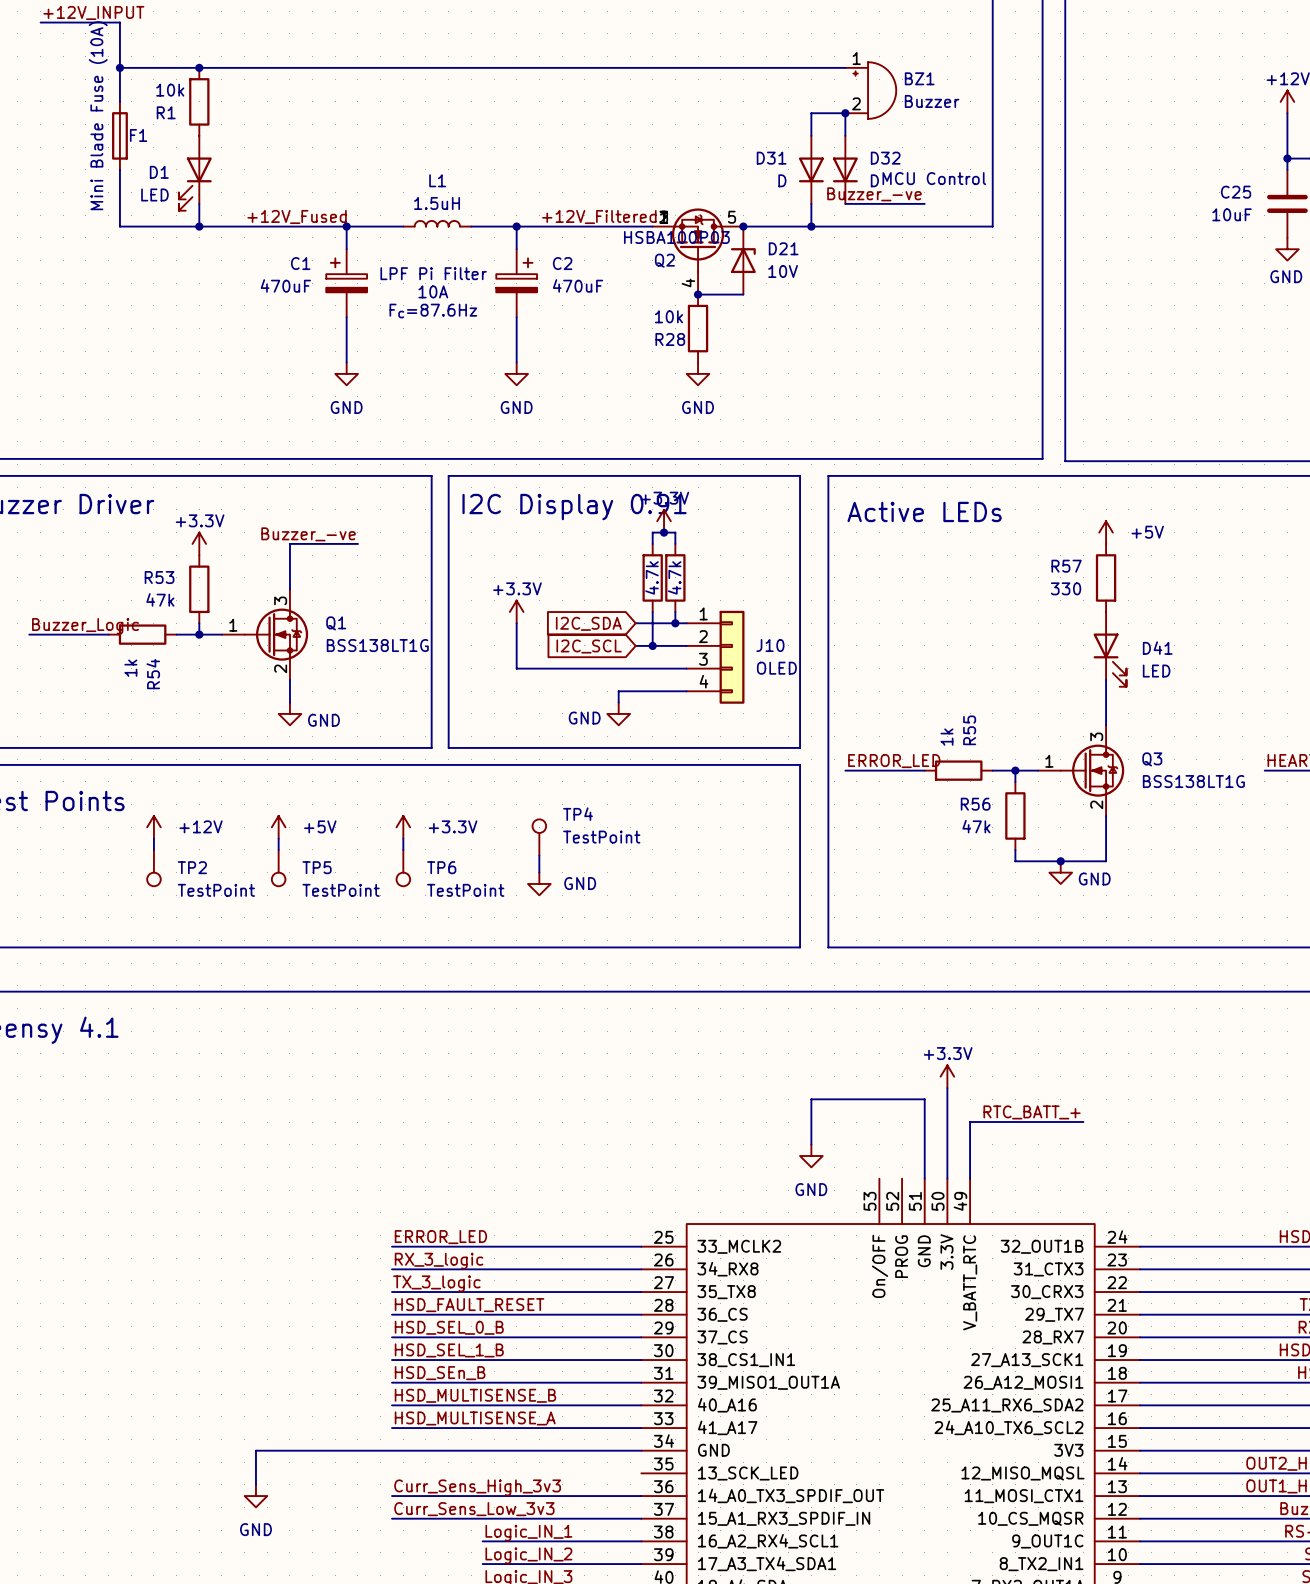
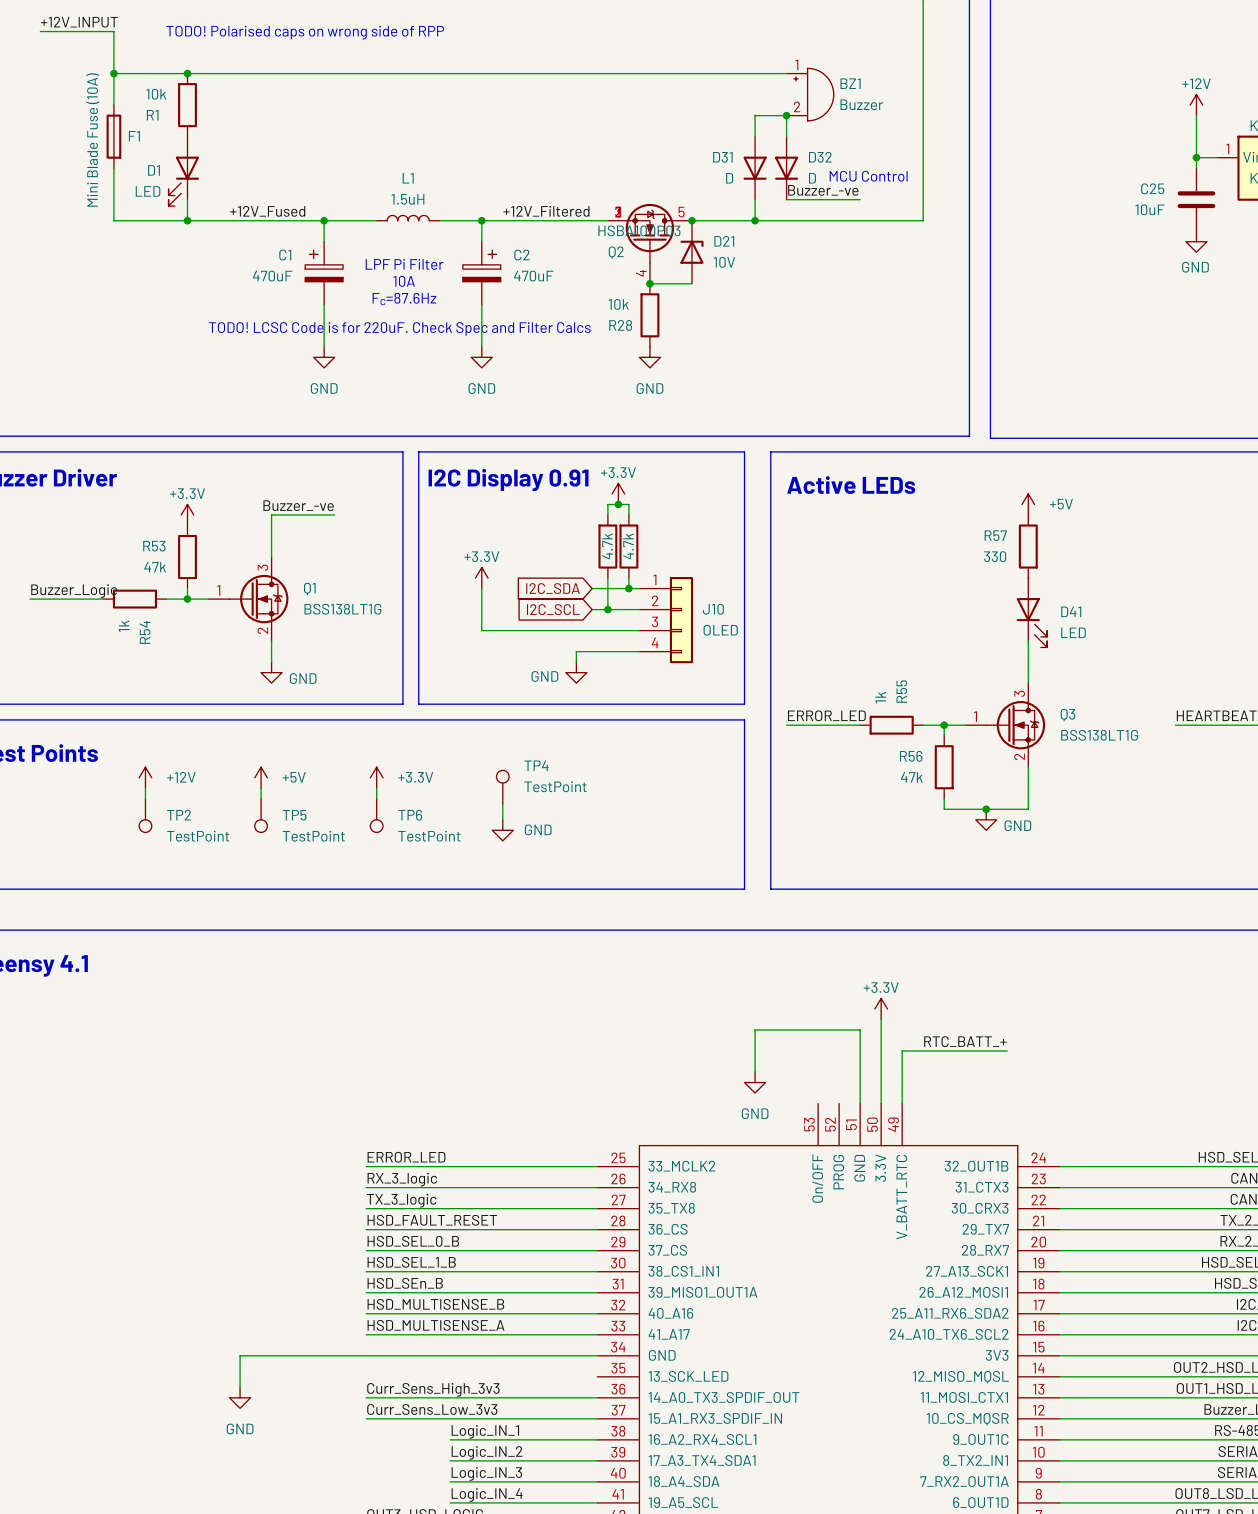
text: none -> TODO! Polarised caps on wrong side of RPP (305, 32)
text: none -> TODO! LCSC Code is for 220uF. Check Spec and Filter Calcs (399, 328)

